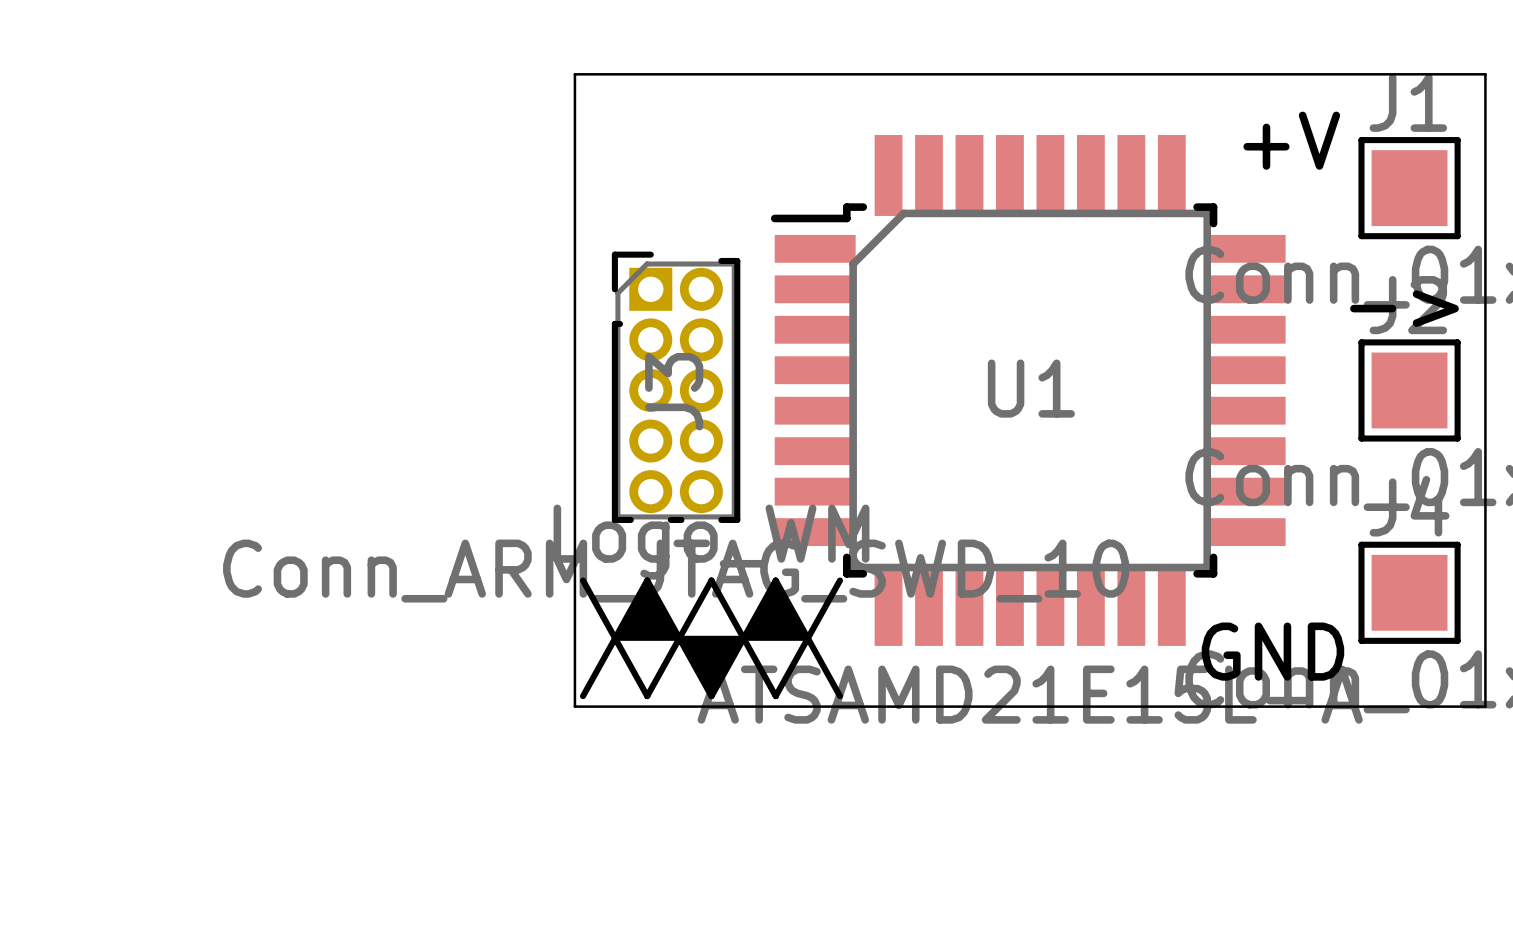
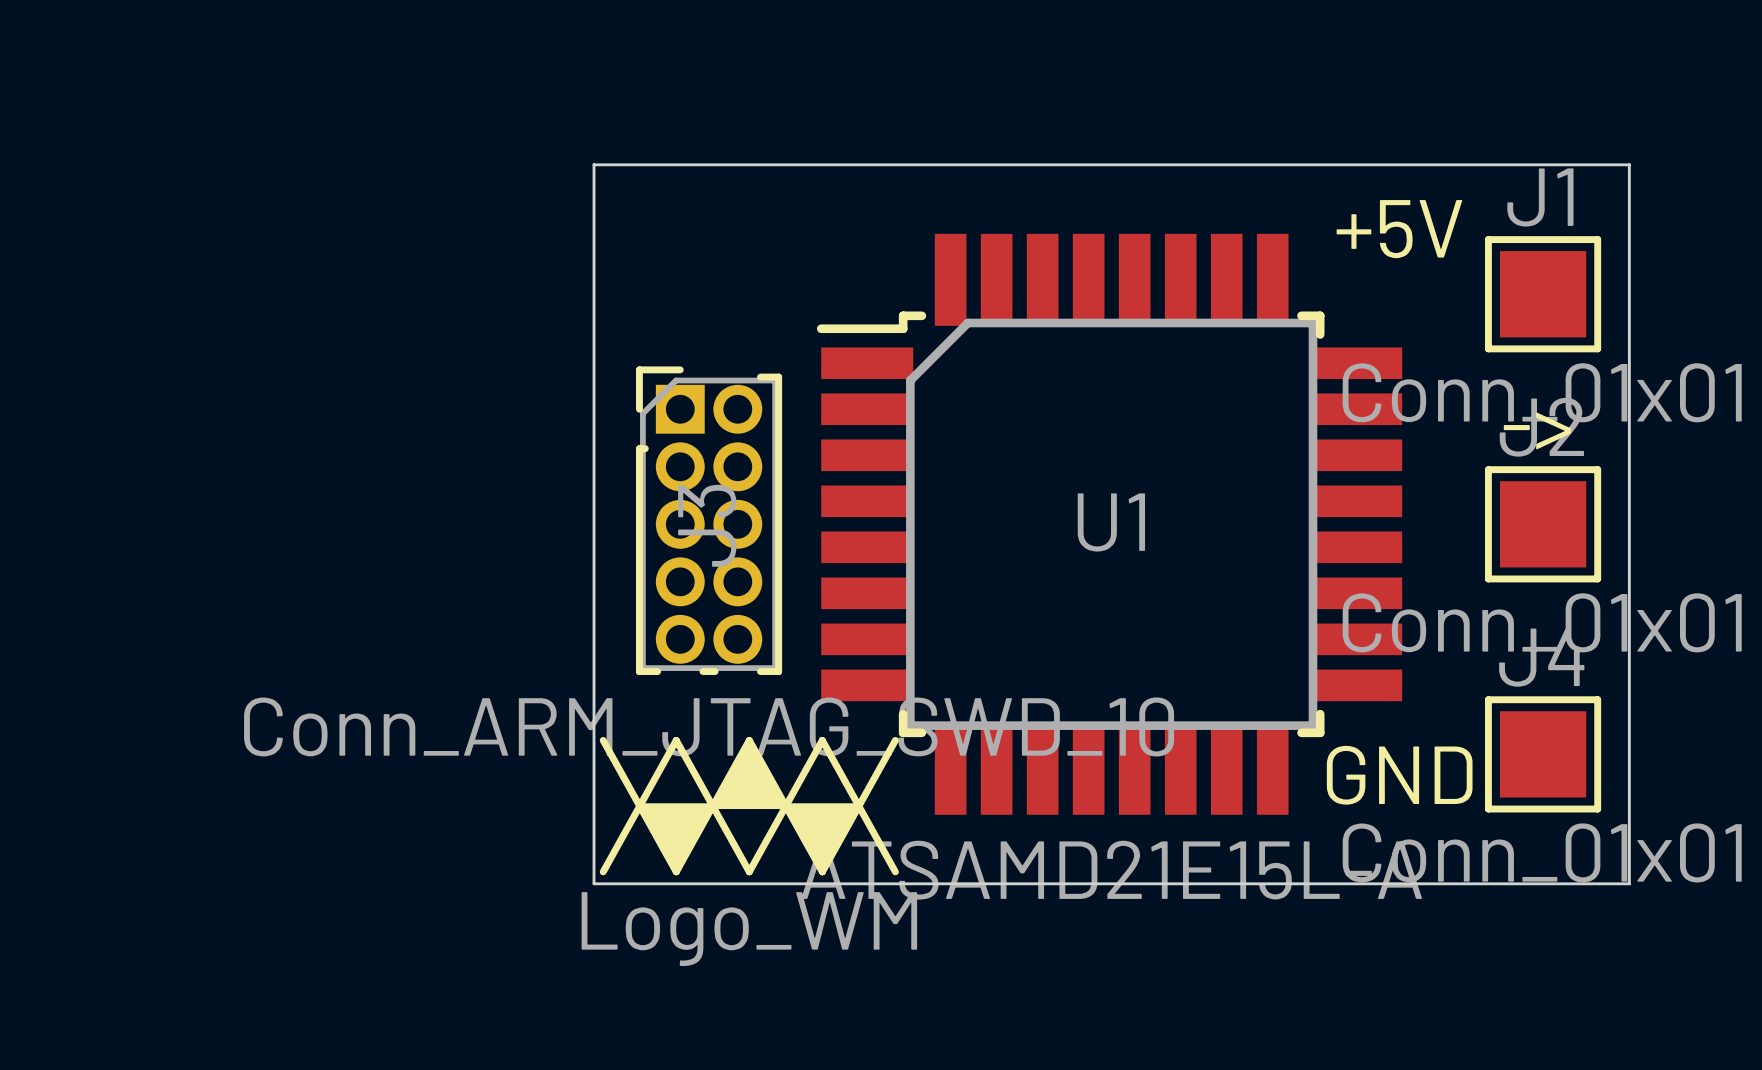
text: +V (1291, 140) -> +5V (1399, 229)
drawing shape: [553, 504, 870, 700] -> [581, 736, 918, 967]
text position: GND (1272, 651) -> GND (1399, 775)

